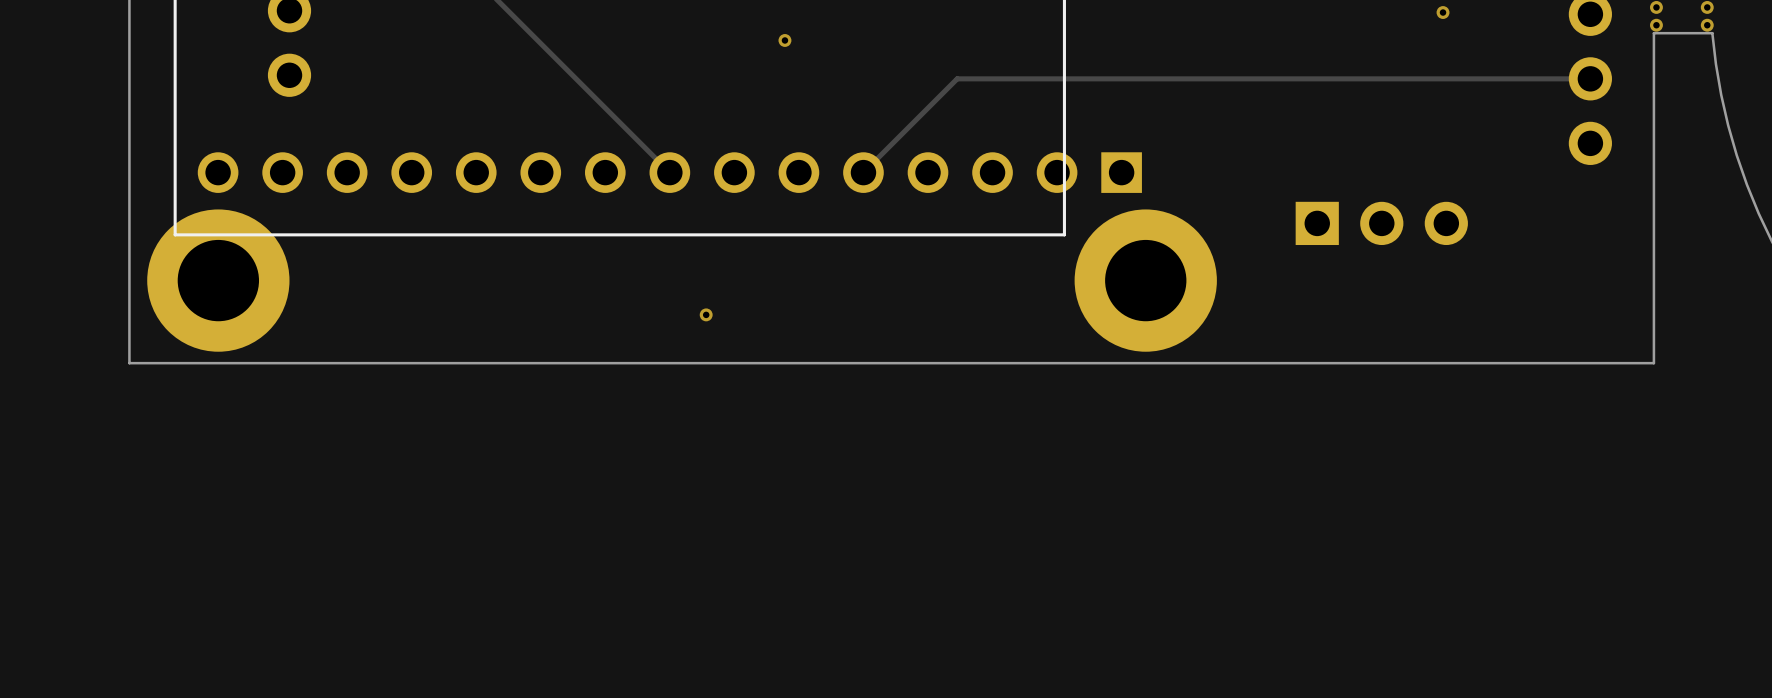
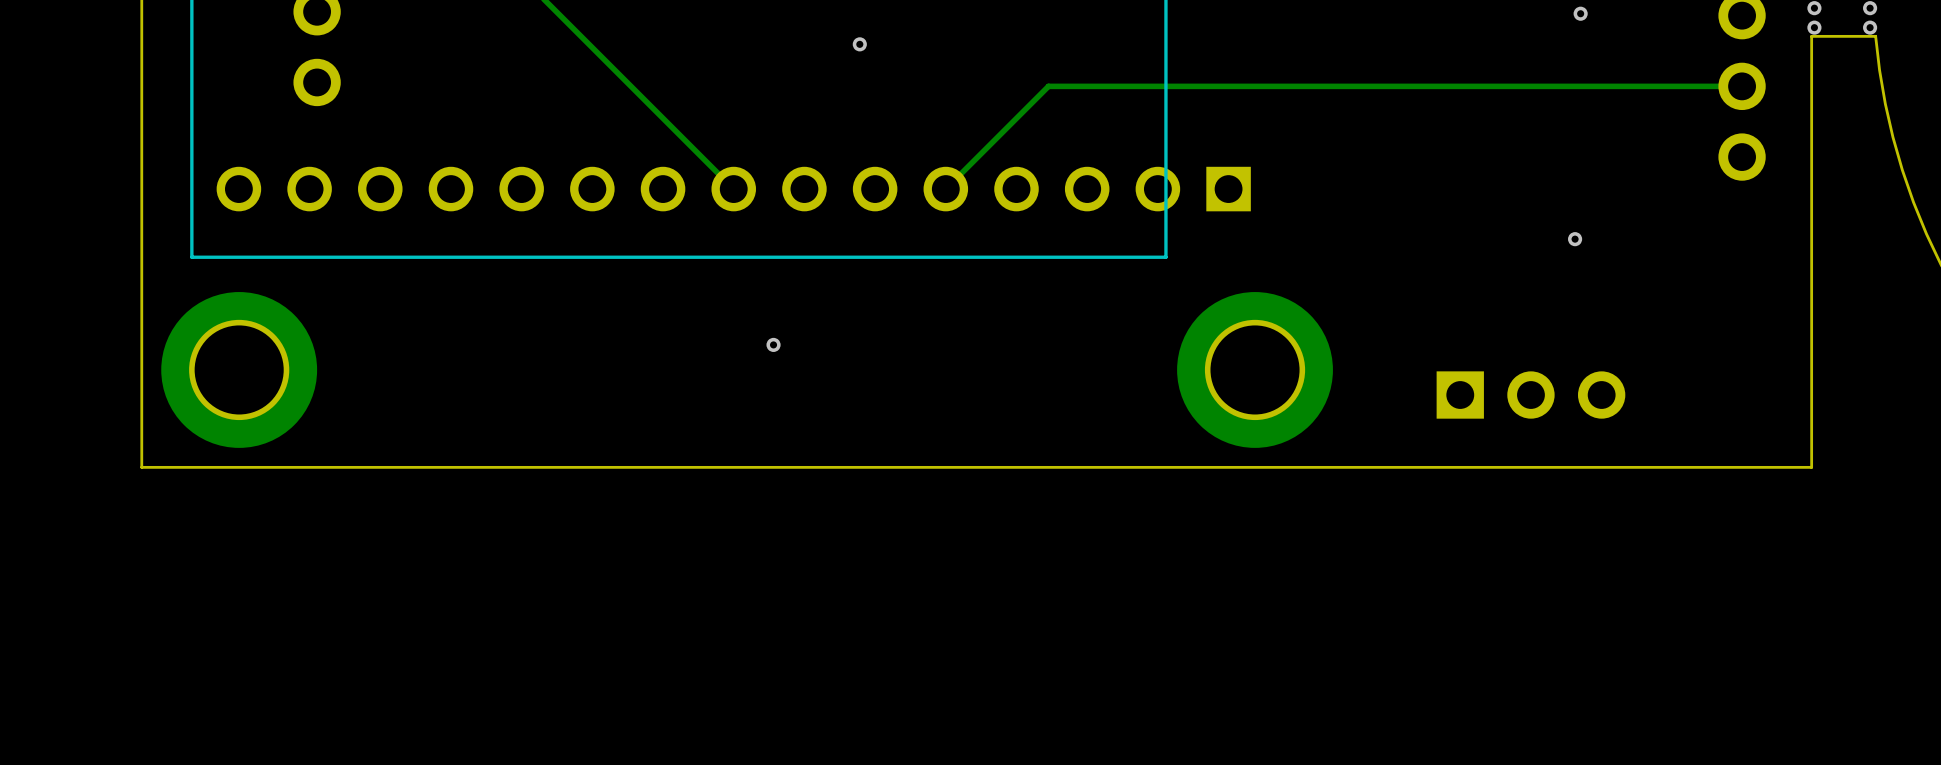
via: none -> (1575, 239)
part position: (1381, 223) -> (1530, 395)
part position: (218, 280) -> (239, 369)
part position: (1145, 280) -> (1255, 369)
board edge: (1653, 363) (129, 363) -> (1811, 397) (1811, 467) (141, 467) (141, 397)

